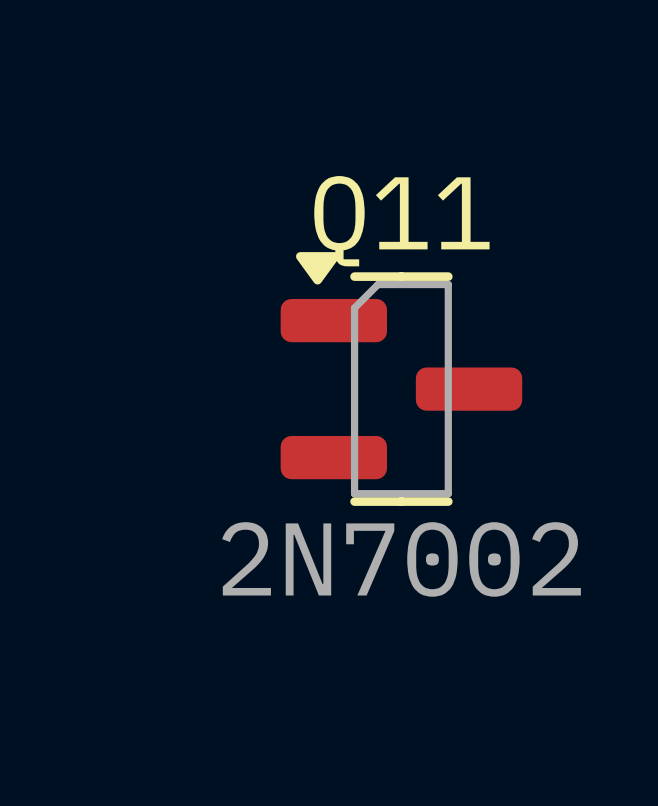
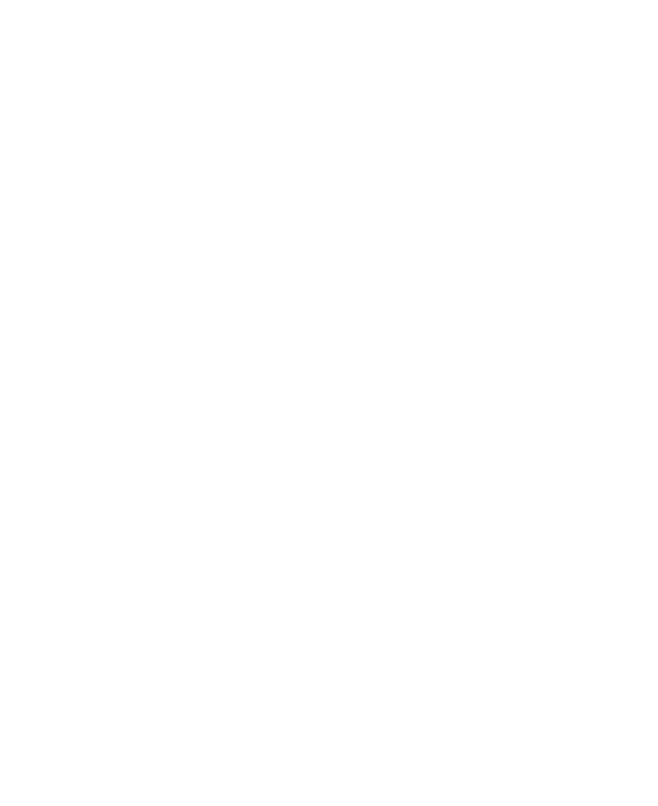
Q11: 2N7002 (401, 379) -> none

